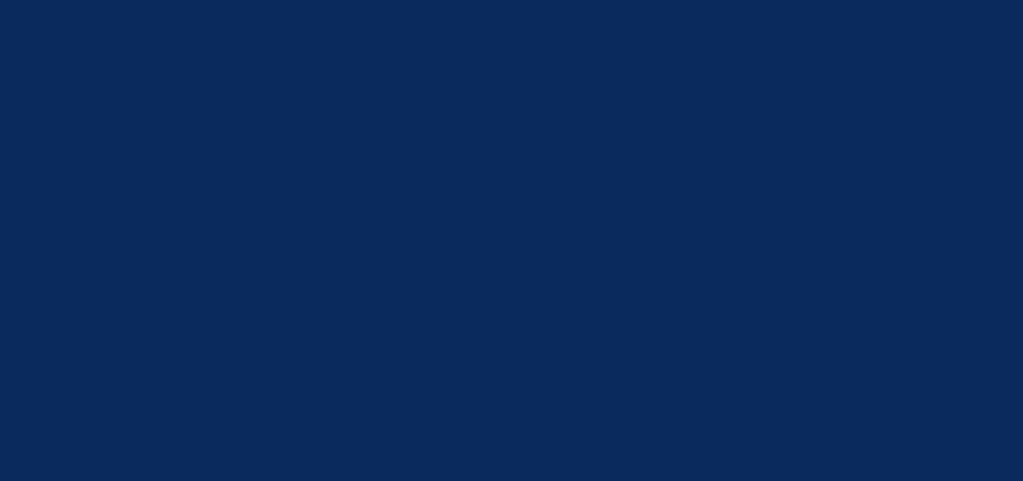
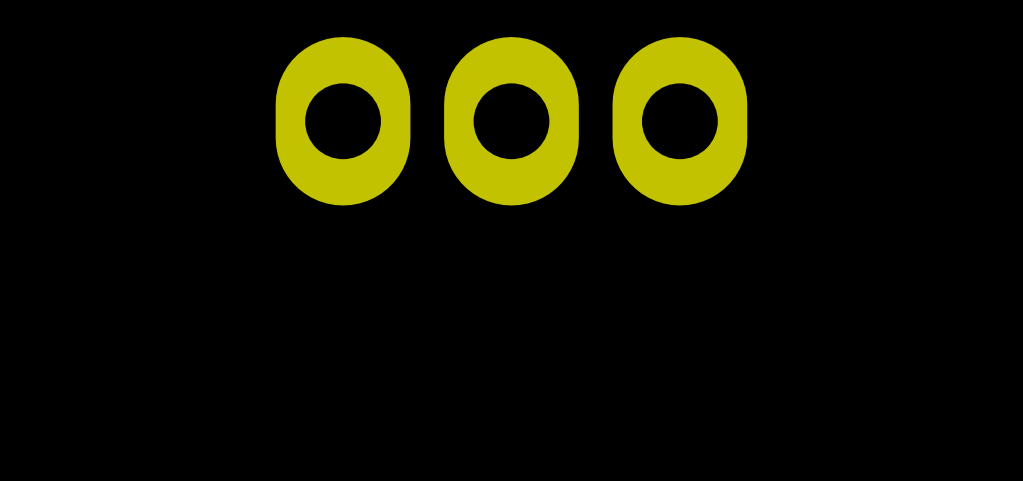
part: none -> (511, 121)

